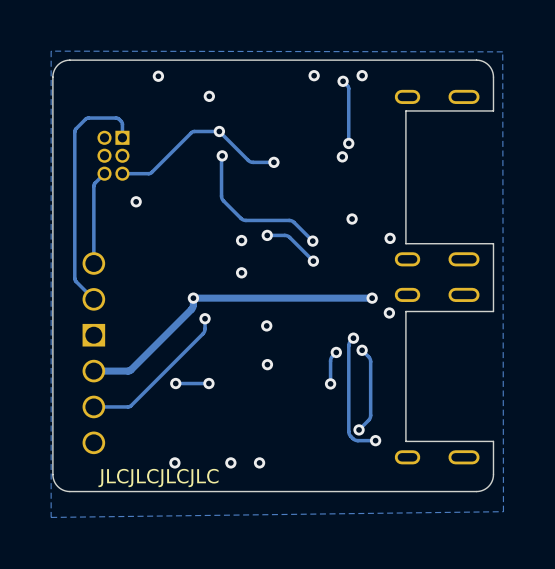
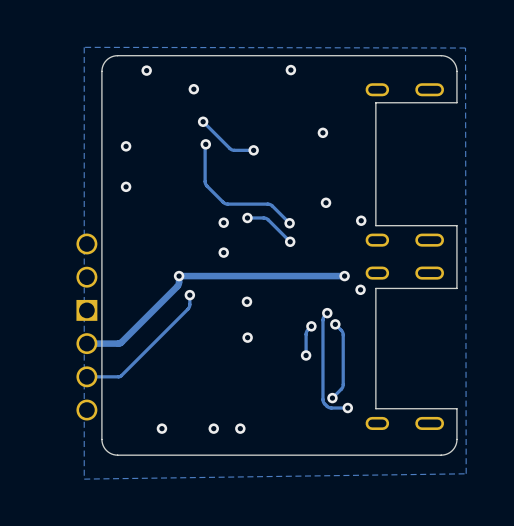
zone outline: (502, 51) (51, 51) (51, 517) (503, 511) -> (465, 48) (84, 47) (84, 479) (466, 473)
board edge: (127, 60) (65, 60) (56, 66) (52, 77) (53, 476) (57, 486) (65, 490) (127, 491) -> (117, 55) (106, 60) (101, 71) (101, 439) (106, 450) (117, 455)
via: (362, 75) -> none
track: (343, 81) (348, 88) (348, 143) -> none
via: (343, 81) -> none
track: (219, 131) (192, 132) (150, 173) (122, 173) -> none
track: (122, 137) (122, 123) (116, 118) (87, 118) (74, 130) (74, 278) (93, 299) -> none
part: (113, 155) -> none
via: (342, 156) -> none
via: none -> (126, 146)
track: (104, 173) (93, 185) (93, 263) -> none
via: (175, 383) -> none
track: (208, 383) (175, 383) -> none
via: (208, 383) -> none
text: JLCJLCJLCJLC (158, 478) -> none

